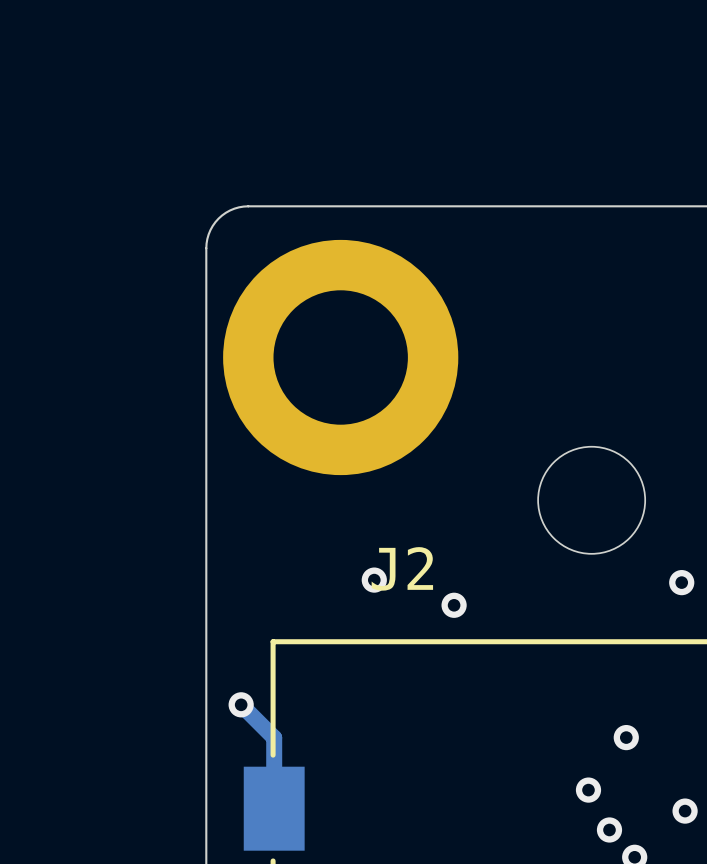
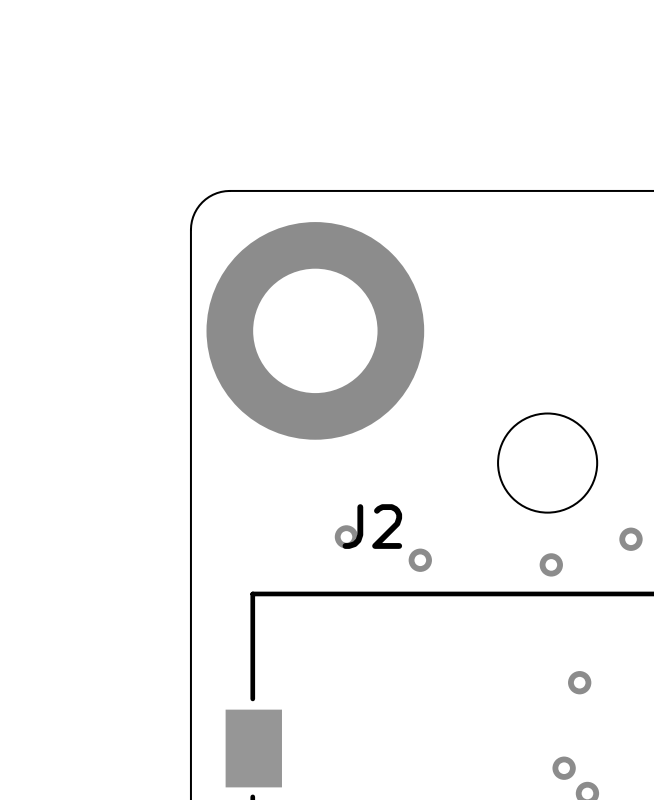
via: none -> (551, 564)
track: (241, 704) (274, 737) (274, 808) -> none
via: (241, 704) -> none
via: (588, 790) -> none
via: (685, 811) -> none

